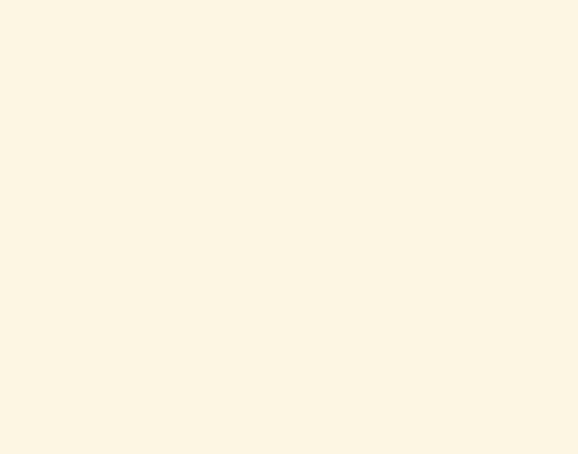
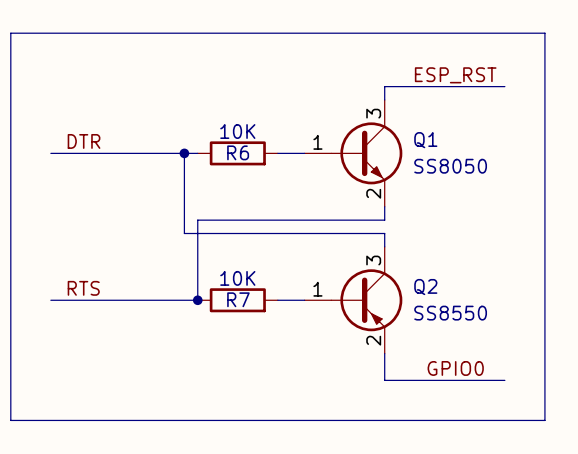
line: none -> (10, 33) (544, 33) (544, 420) (10, 420) (10, 33)
label: none -> ESP_RST (455, 75)
wire: none -> (504, 86) (384, 86) (384, 99)
label: none -> DTR (84, 141)
wire: none -> (50, 153) (197, 153)
wire: none -> (184, 153) (184, 233) (384, 233) (384, 246)
junction: none -> (184, 153)
R6: none -> 10K (237, 153)
wire: none -> (277, 153) (304, 153)
Q1: none -> SS8050 (353, 153)
wire: none -> (384, 206) (384, 220) (197, 220) (197, 300) (50, 300)
label: none -> RTS (83, 288)
junction: none -> (197, 300)
R7: none -> 10K (237, 300)
wire: none -> (277, 300) (304, 300)
Q2: none -> SS8550 (353, 300)
wire: none -> (384, 353) (384, 380) (504, 380)
label: none -> GPIO0 (455, 368)

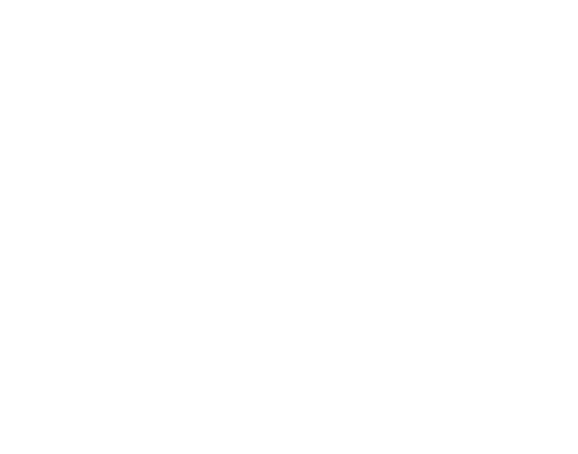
line: (10, 33) (544, 33) (544, 420) (10, 420) (10, 33) -> none
label: ESP_RST (455, 75) -> none
wire: (504, 86) (384, 86) (384, 99) -> none
label: DTR (84, 141) -> none
wire: (50, 153) (197, 153) -> none
wire: (184, 153) (184, 233) (384, 233) (384, 246) -> none
junction: (184, 153) -> none
R6: 10K (237, 153) -> none
wire: (277, 153) (304, 153) -> none
Q1: SS8050 (353, 153) -> none
wire: (384, 206) (384, 220) (197, 220) (197, 300) (50, 300) -> none
label: RTS (83, 288) -> none
junction: (197, 300) -> none
R7: 10K (237, 300) -> none
wire: (277, 300) (304, 300) -> none
Q2: SS8550 (353, 300) -> none
wire: (384, 353) (384, 380) (504, 380) -> none
label: GPIO0 (455, 368) -> none

